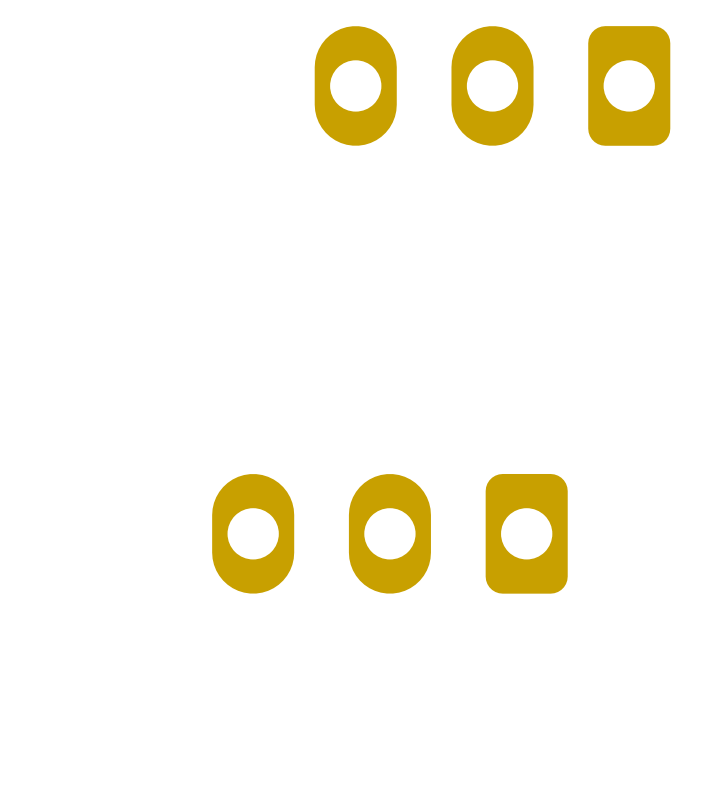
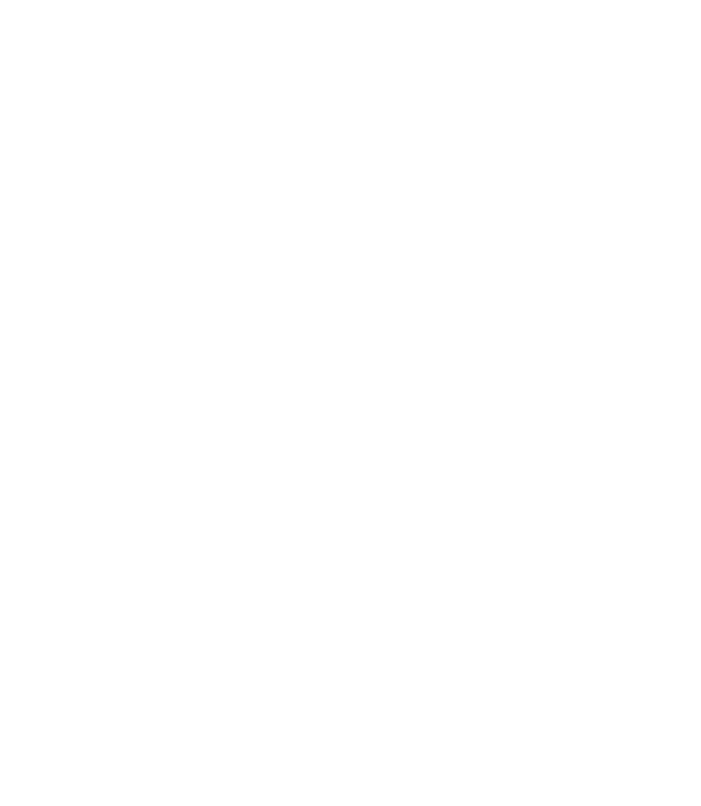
part: (492, 85) -> none
part: (389, 533) -> none

